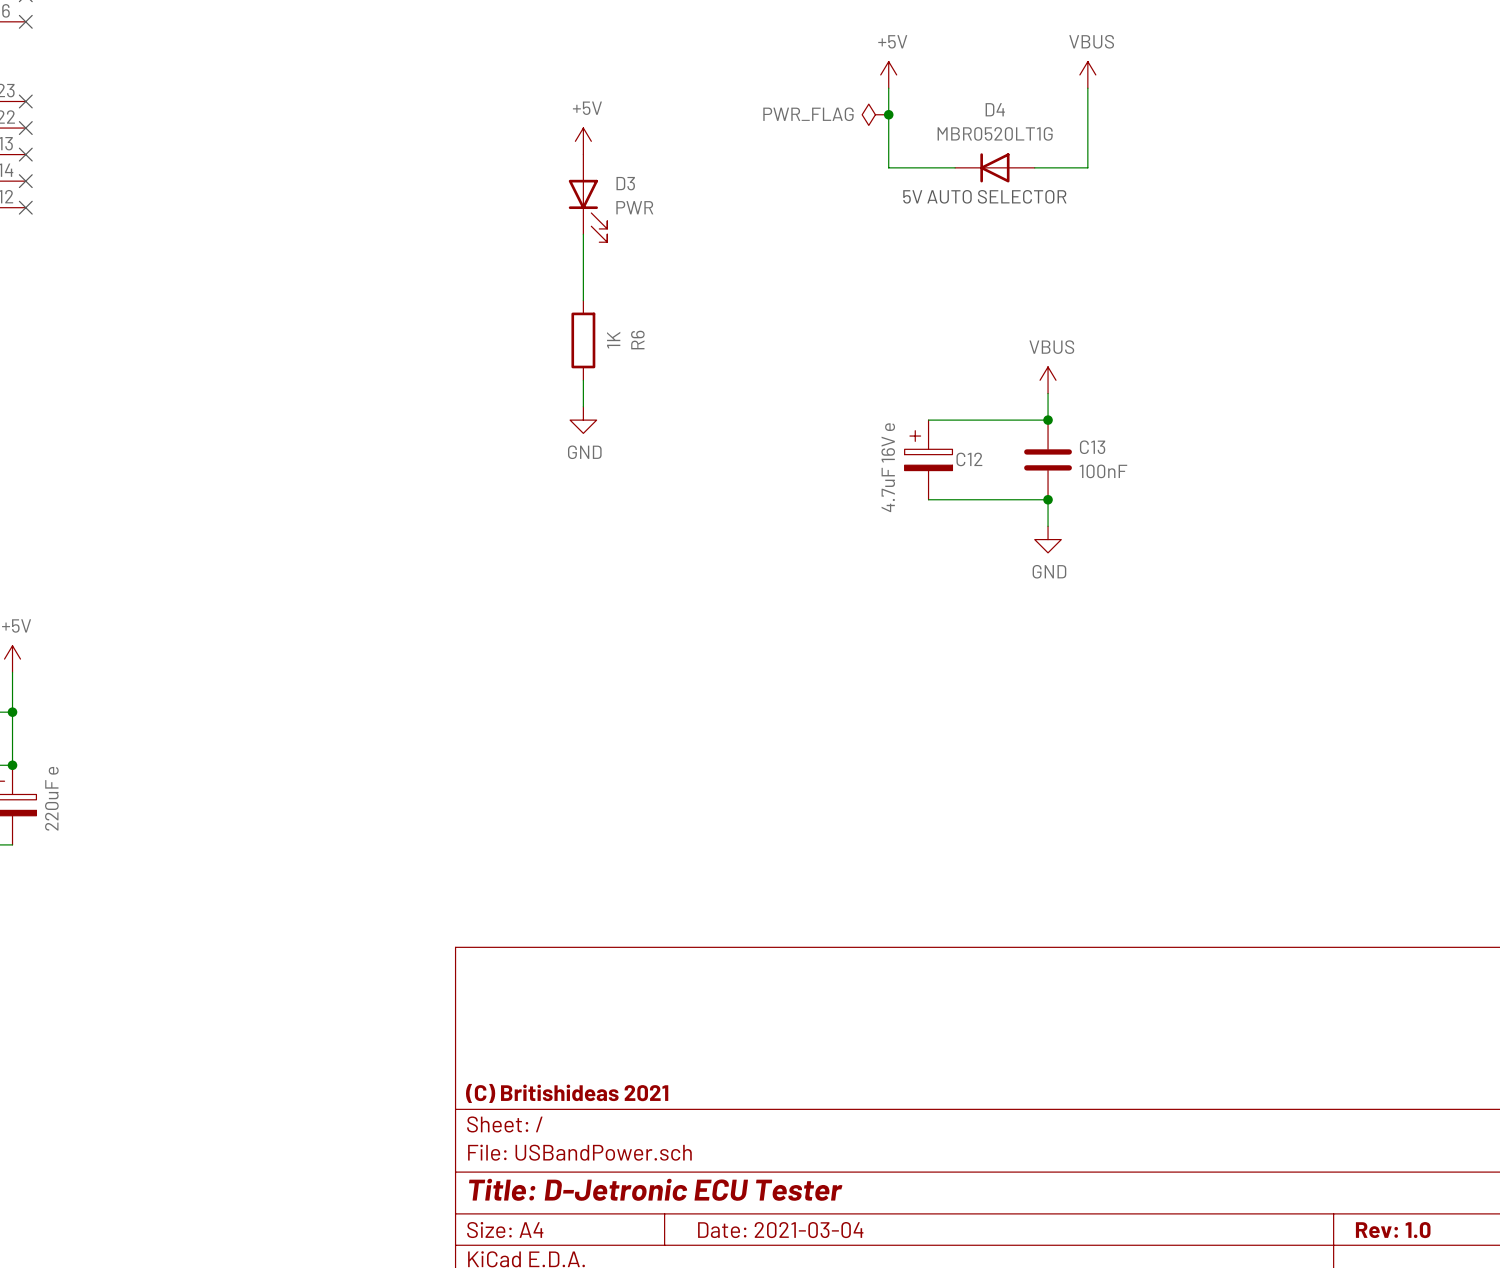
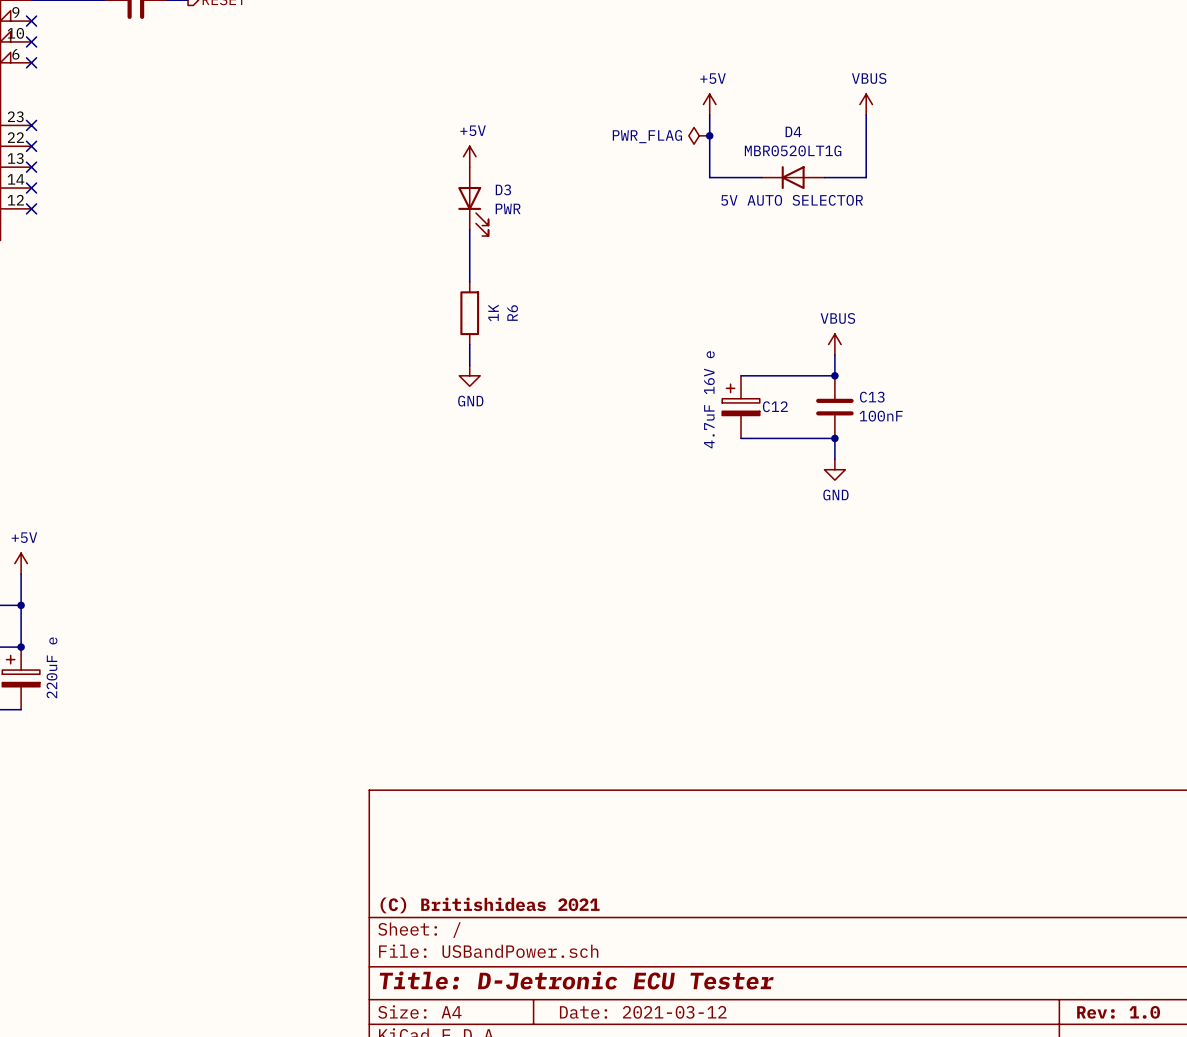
title block: Date: 2021-03-04 (780, 1230) -> Date: 2021-03-12 (643, 1012)

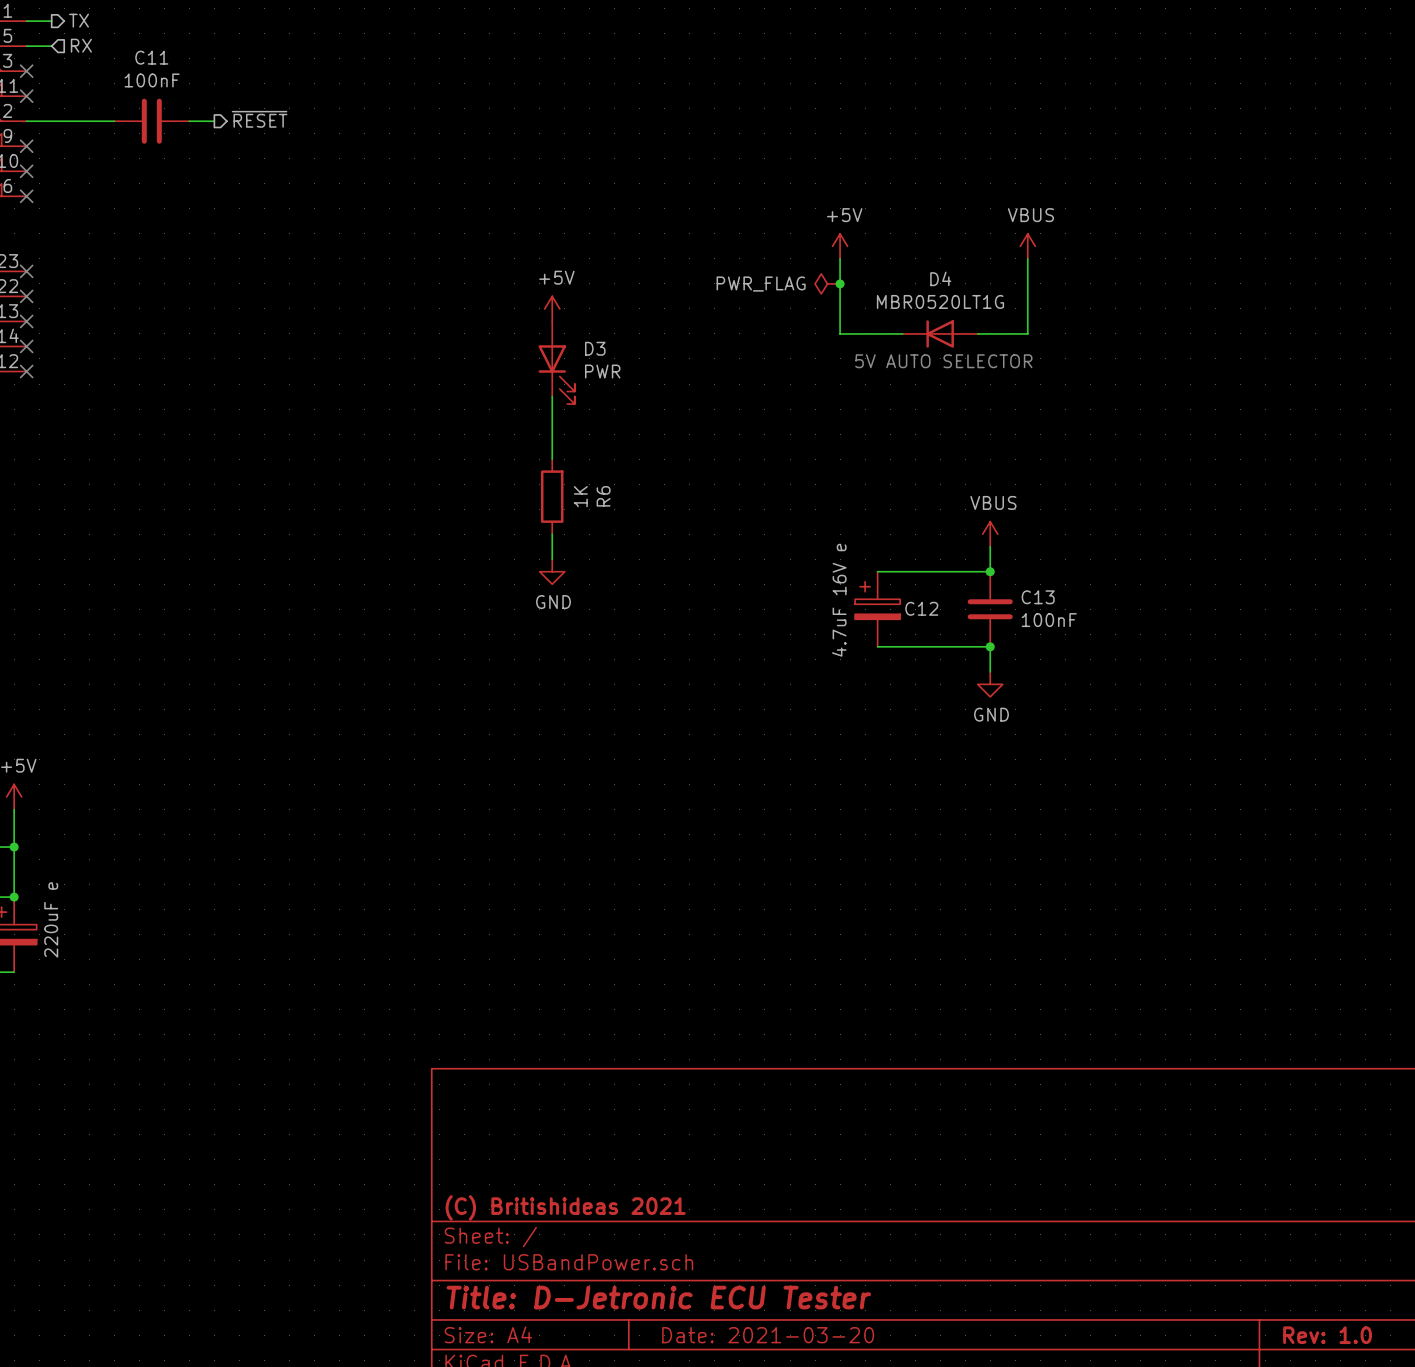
title block: Date: 2021-03-12 (643, 1012) -> Date: 2021-03-20 (768, 1335)

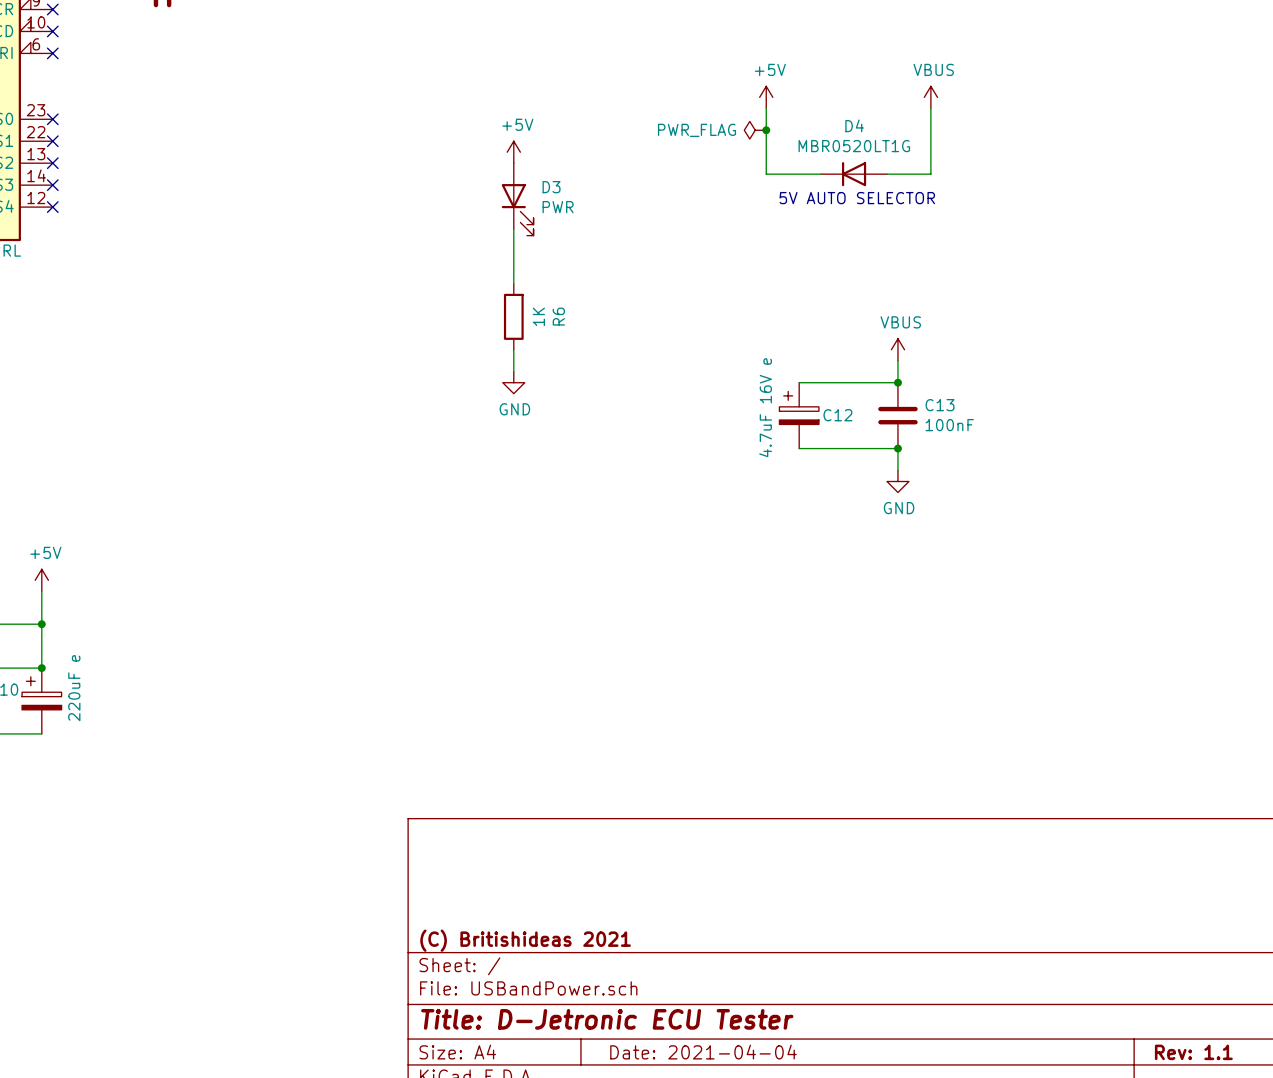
title block: Date: 2021-03-20 (768, 1335) -> Date: 2021-04-04 (703, 1052)
title block: Rev: 1.0 (1327, 1335) -> Rev: 1.1 (1193, 1052)

